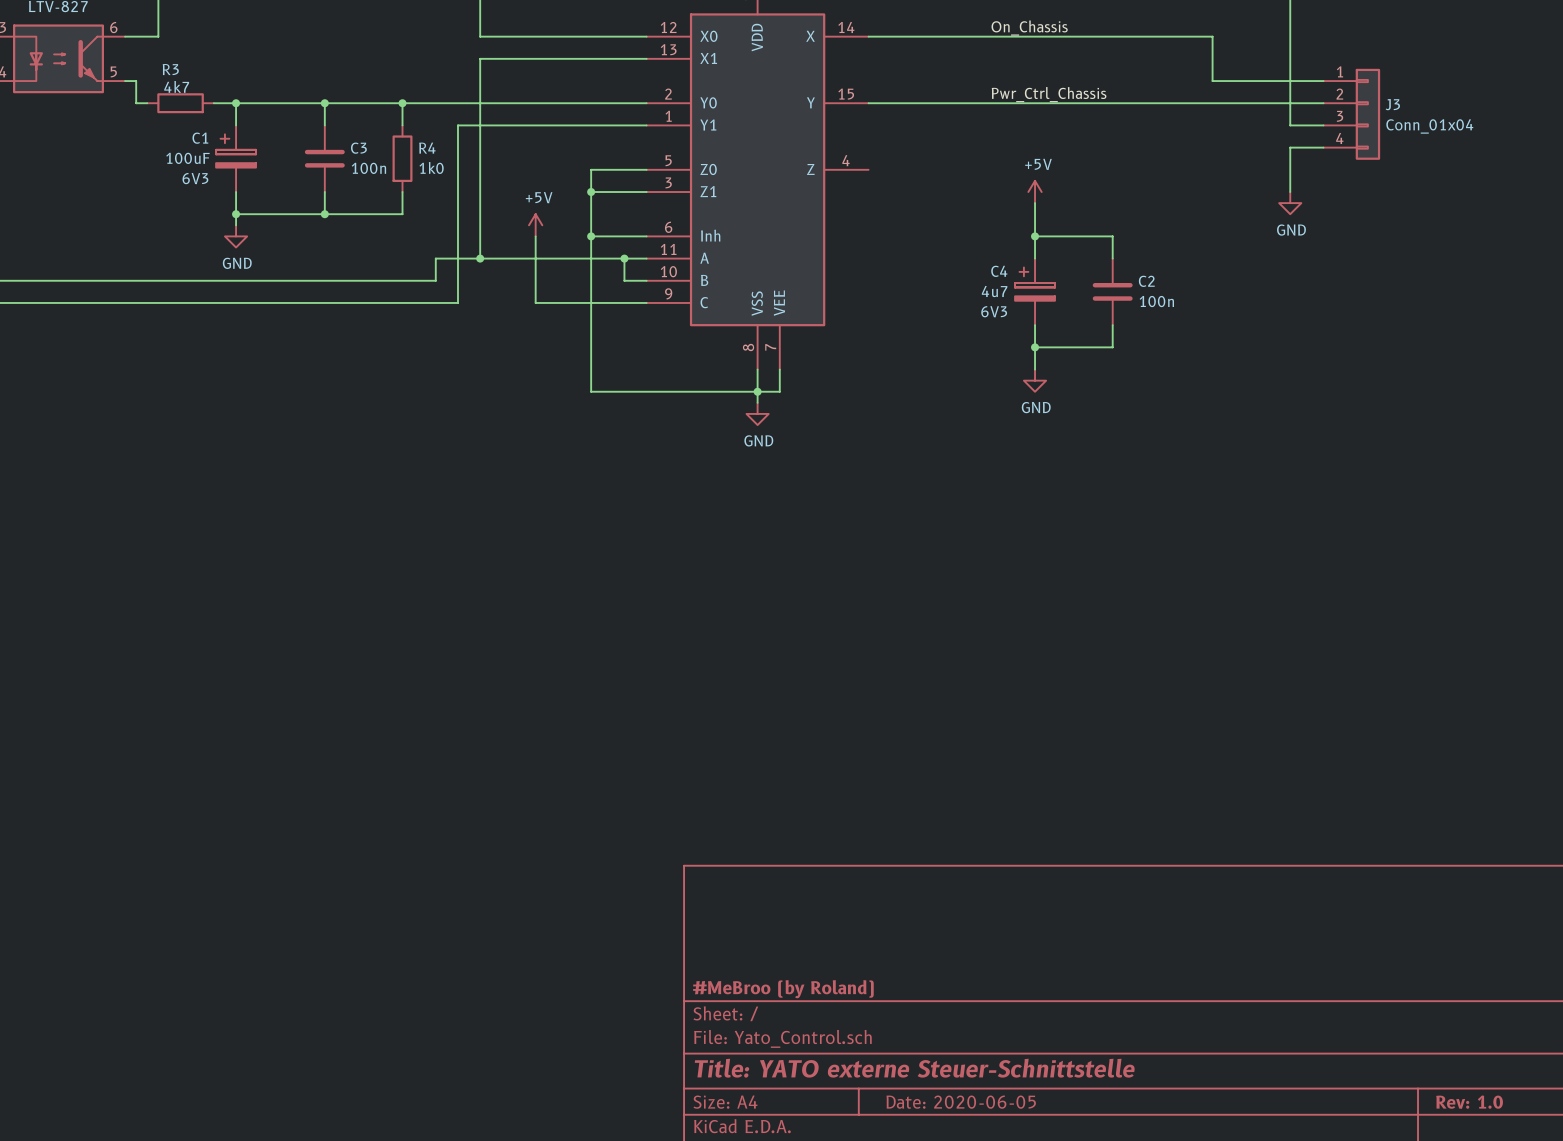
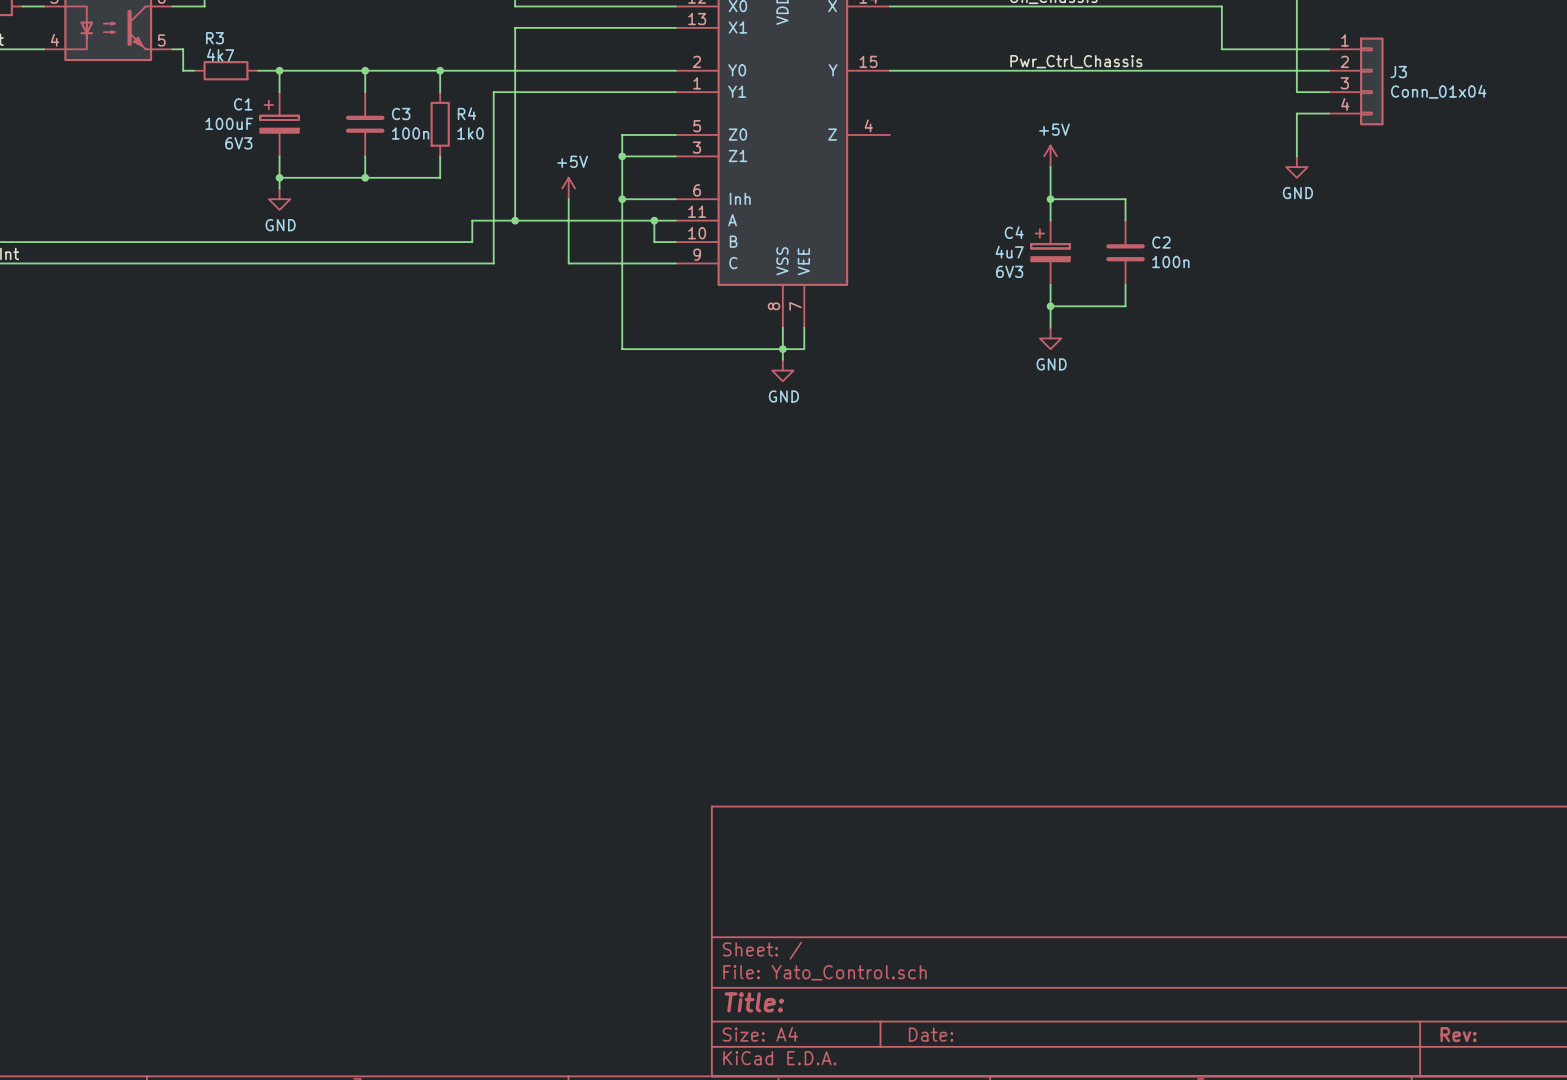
title block: #MeBroo (by Roland) (783, 989) -> none
title block: Title: YATO externe Steuer-Schnittstelle (914, 1068) -> Title: (754, 1002)
title block: Date: 2020-06-05 (961, 1102) -> Date: (931, 1034)
title block: Rev: 1.0 (1469, 1102) -> Rev: (1458, 1034)

